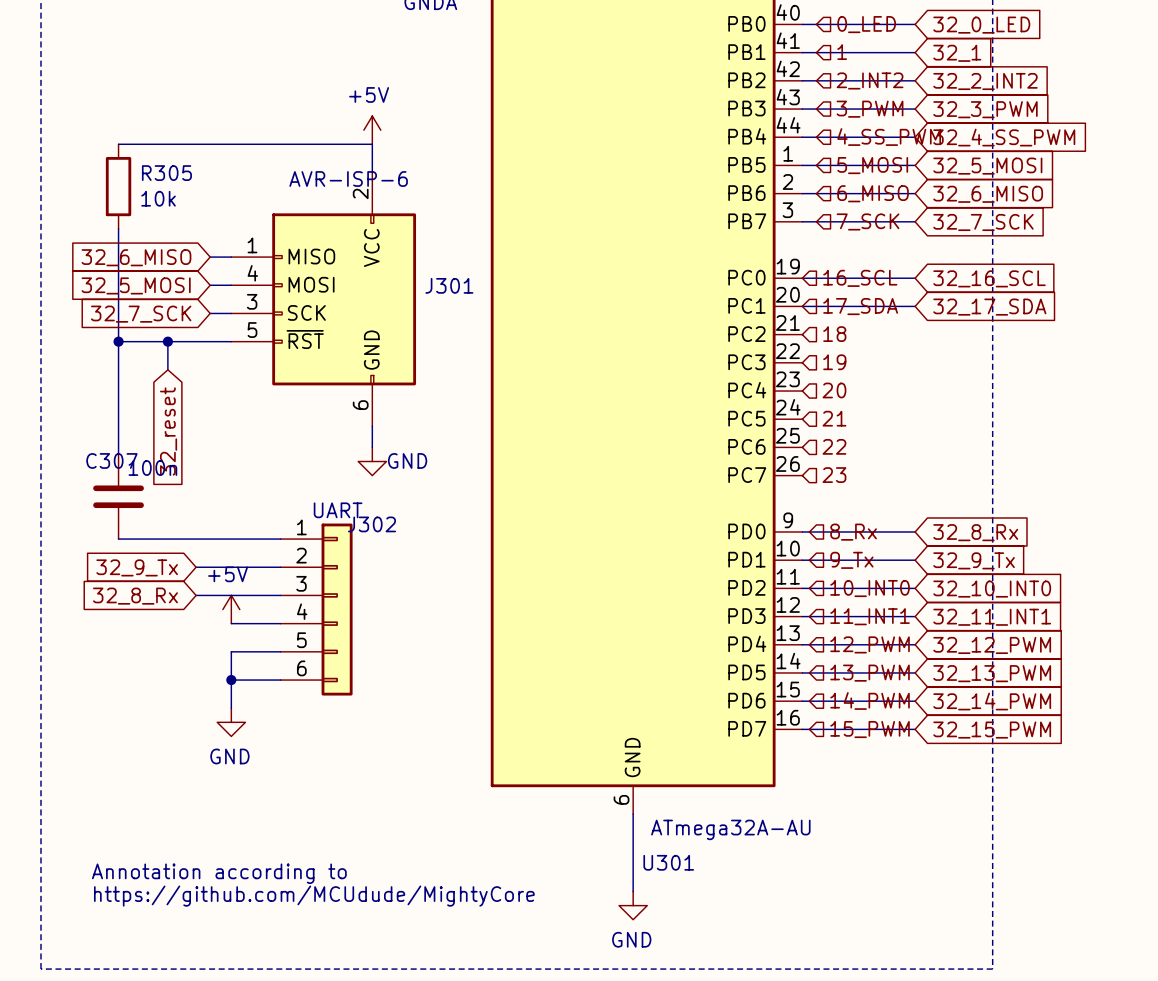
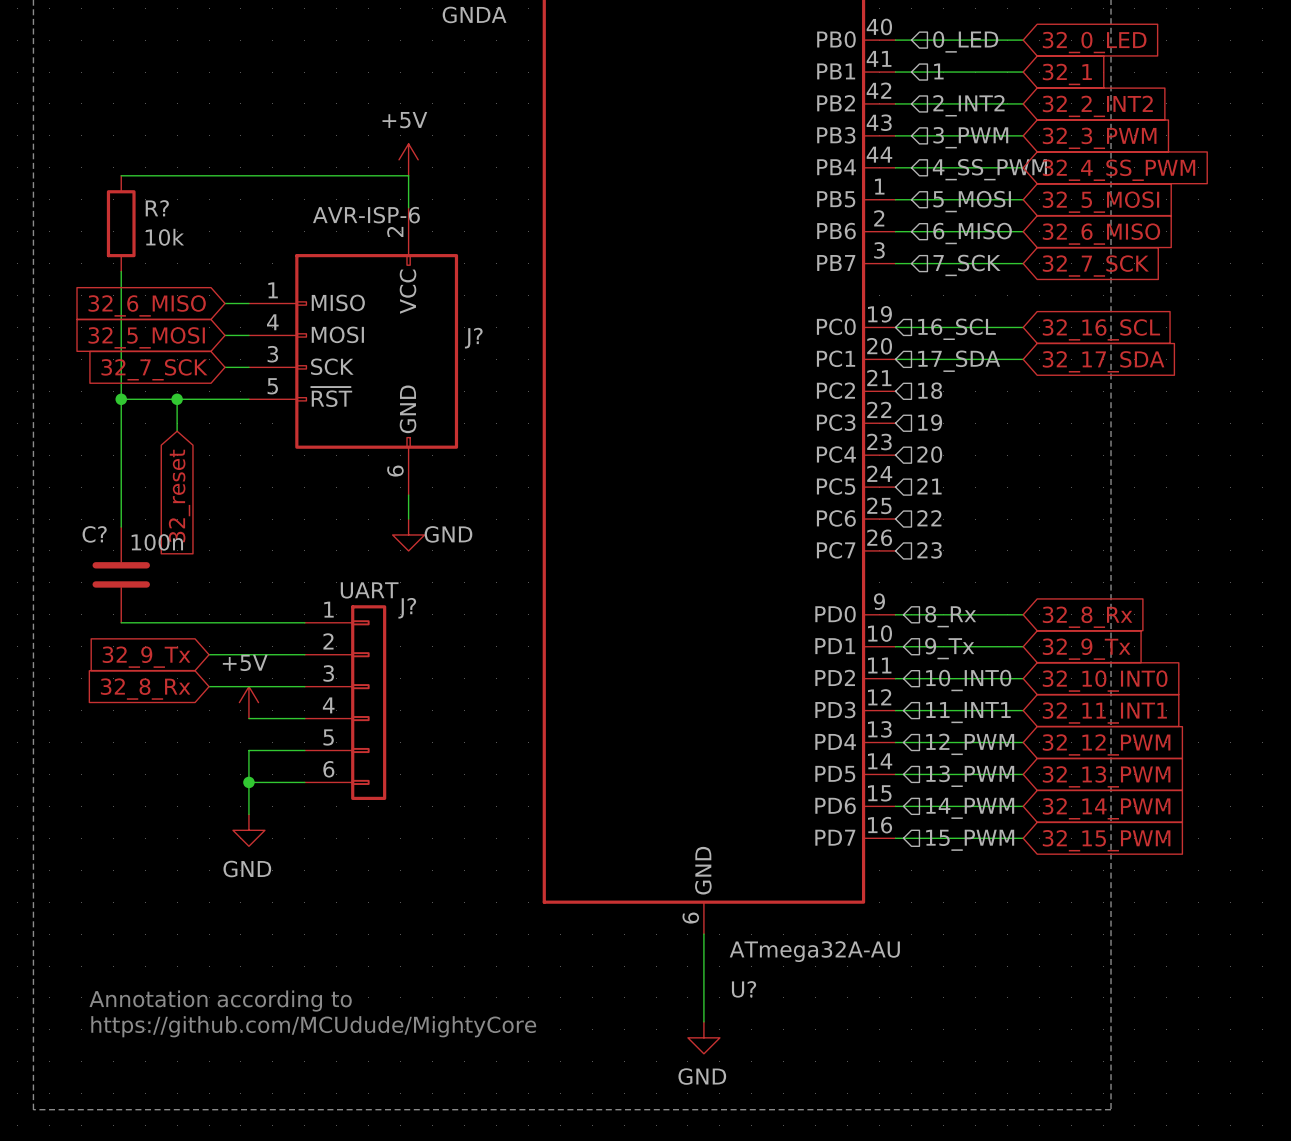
R305 name: R305 (166, 173) -> R? (157, 208)
J301 name: J301 (449, 285) -> J? (473, 338)
C307 name: C307 (111, 460) -> C? (94, 534)
J302 name: J302 (371, 524) -> J? (407, 608)
U301 name: U301 (668, 862) -> U? (744, 989)

